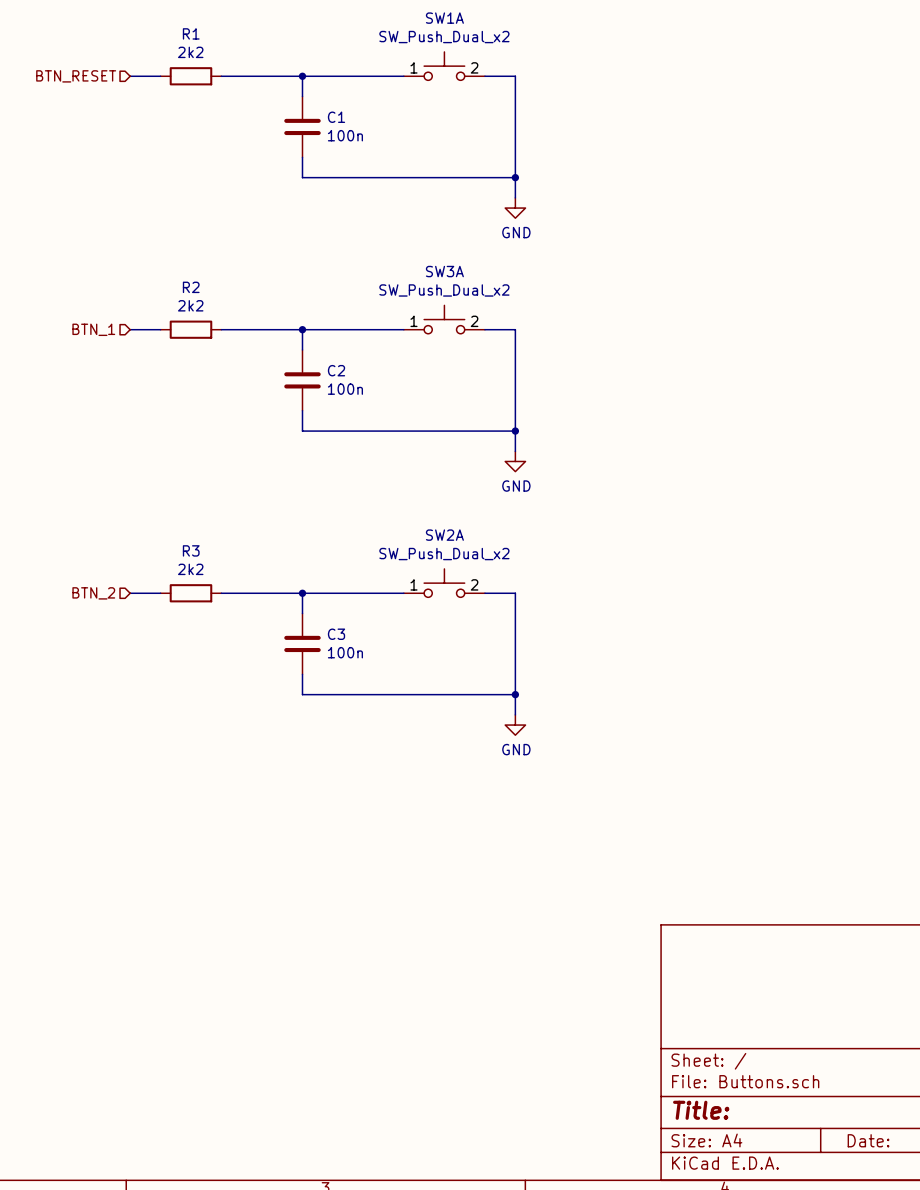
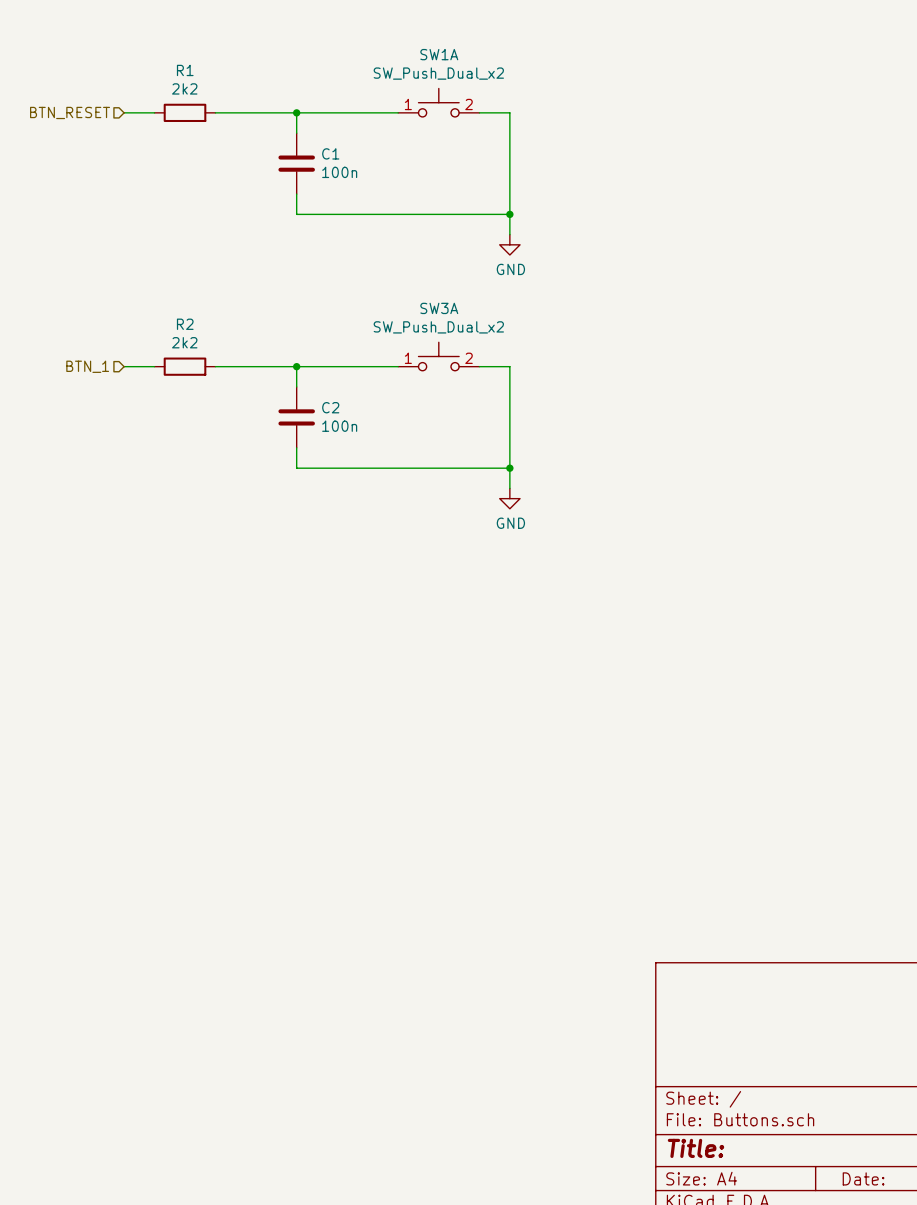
SW2A: SW_Push_Dual_x2 (444, 583) -> none
hierarchical label: BTN_2 (93, 593) -> none
wire: (130, 593) (160, 593) -> none
R3: 2k2 (190, 593) -> none
wire: (221, 593) (403, 593) -> none
wire: (302, 593) (302, 613) -> none
junction: (302, 593) -> none
wire: (484, 593) (515, 593) (515, 714) -> none
C3: 100n (302, 643) -> none
wire: (302, 674) (302, 694) (515, 694) -> none
junction: (515, 694) -> none
power symbol: GND (515, 725) -> none

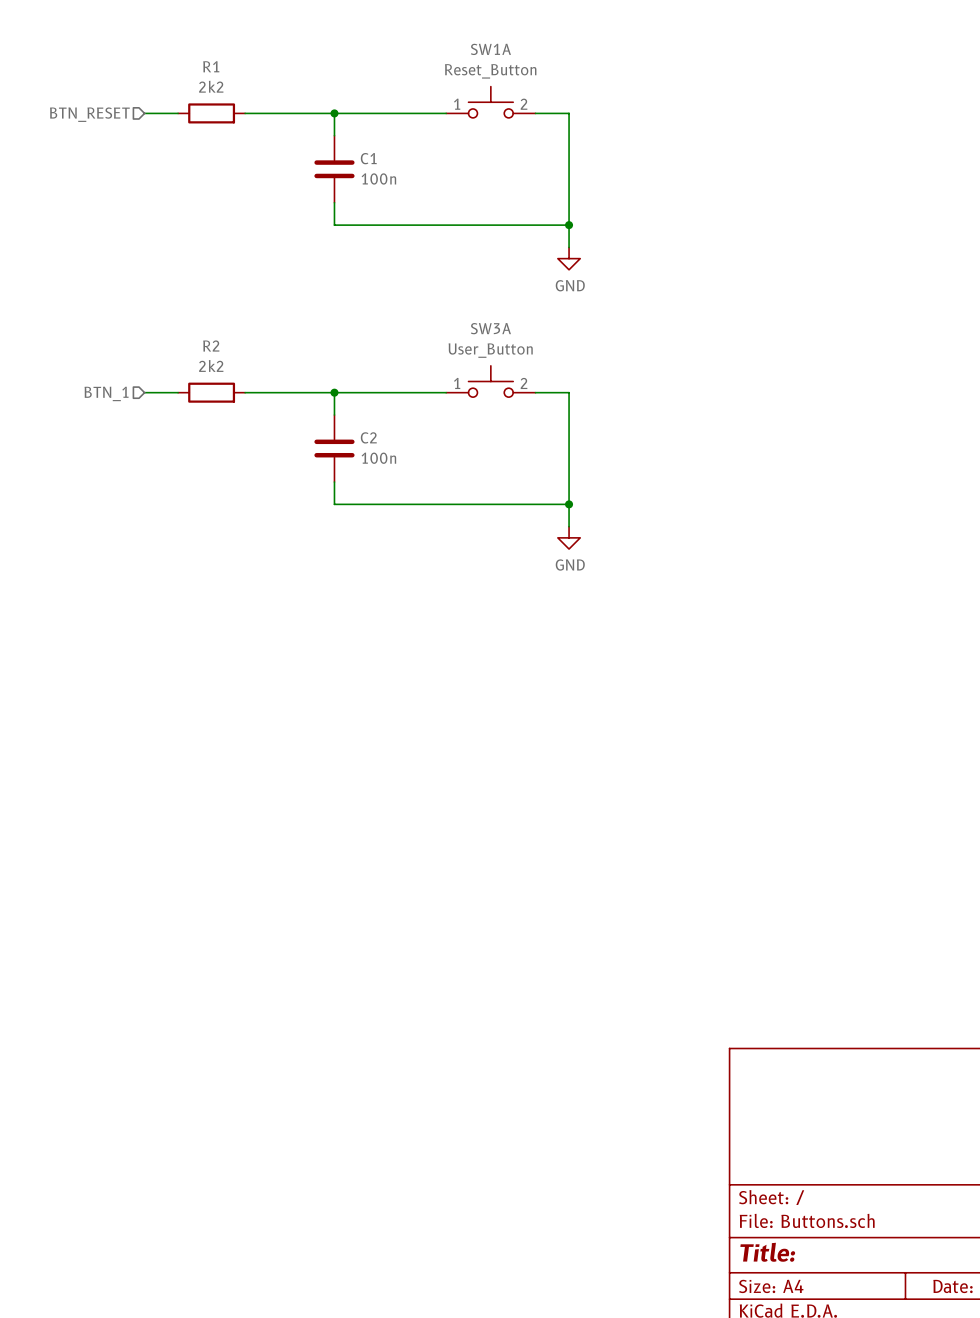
SW1A value: SW_Push_Dual_x2 (438, 73) -> Reset_Button (490, 71)
SW3A value: SW_Push_Dual_x2 (438, 327) -> User_Button (490, 350)

